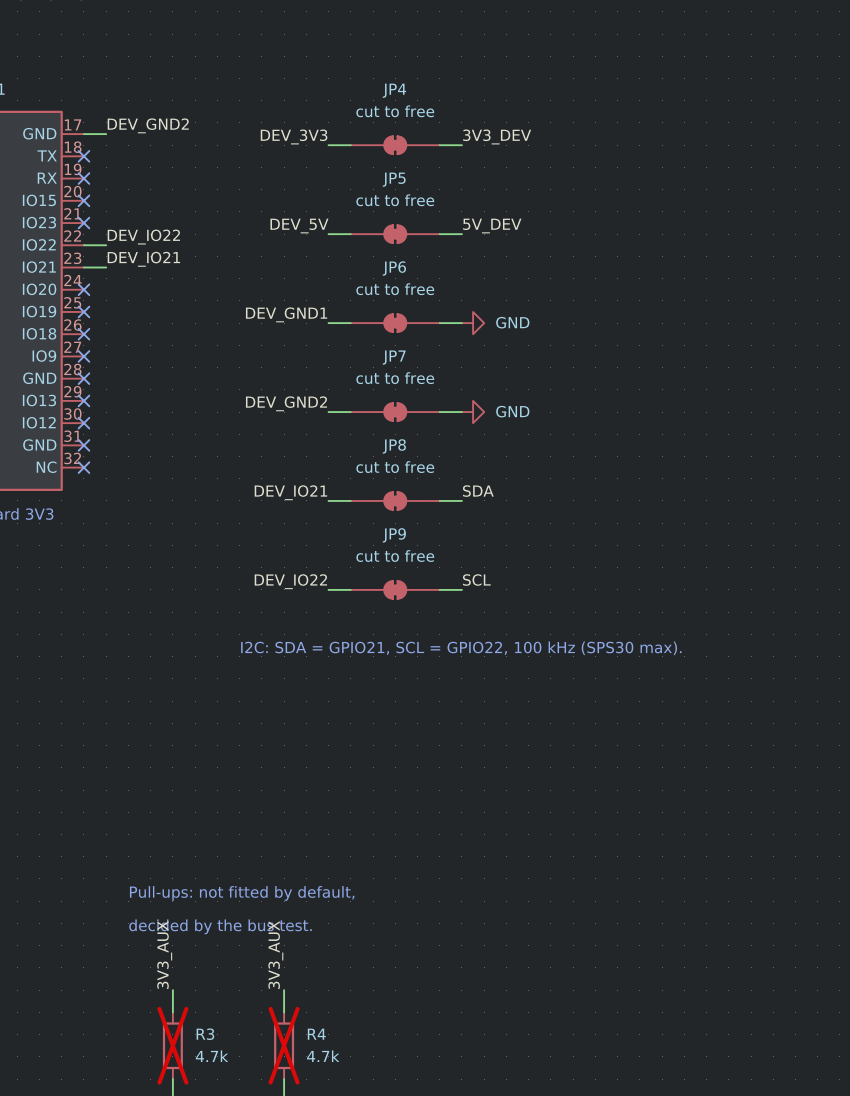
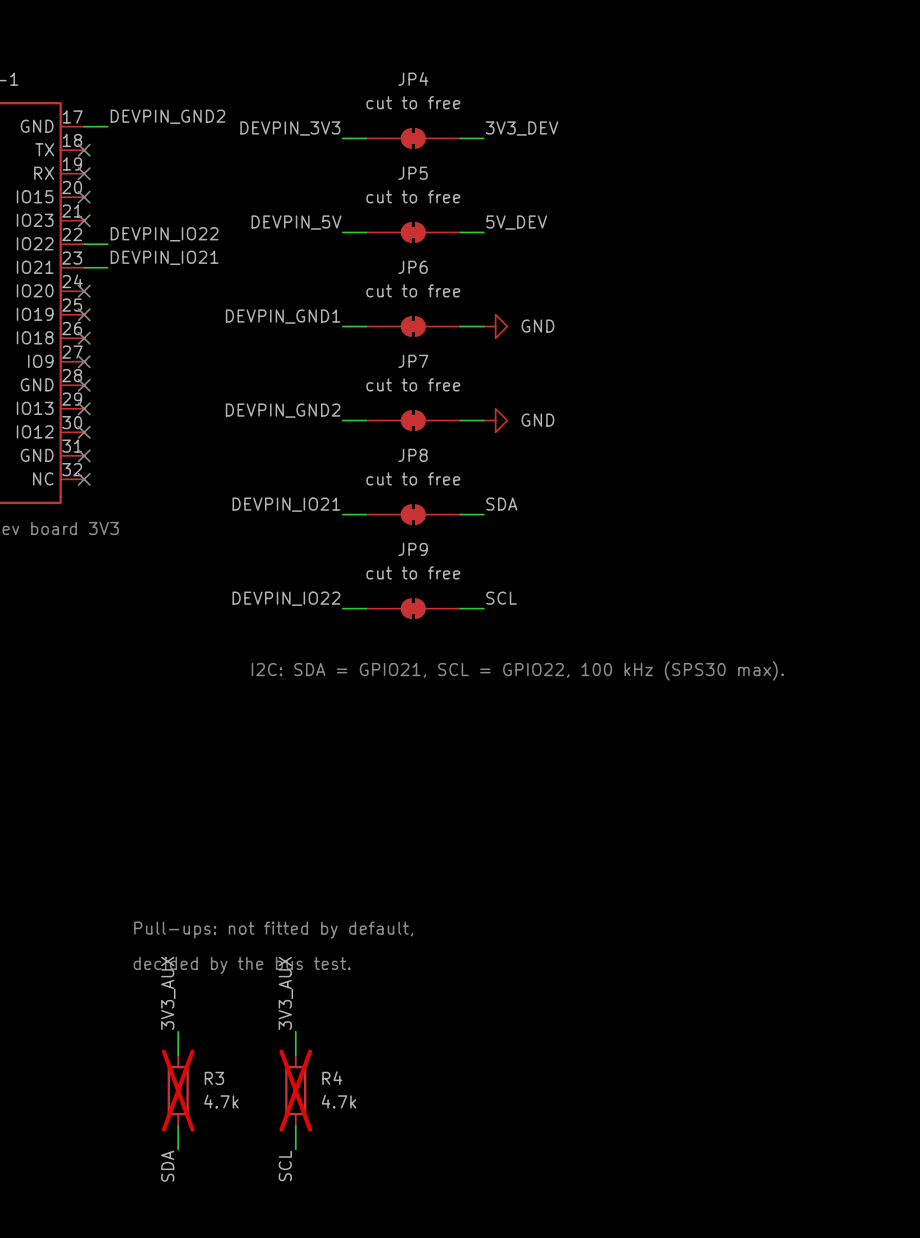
label: DEV_GND2 (148, 125) -> DEVPIN_GND2 (167, 116)
label: DEV_3V3 (294, 136) -> DEVPIN_3V3 (290, 128)
label: DEV_5V (299, 226) -> DEVPIN_5V (296, 222)
label: DEV_IO22 (143, 237) -> DEVPIN_IO22 (164, 234)
label: DEV_IO21 (143, 259) -> DEVPIN_IO21 (164, 257)
label: DEV_GND1 (286, 314) -> DEVPIN_GND1 (283, 316)
label: DEV_GND2 (286, 403) -> DEVPIN_GND2 (283, 410)
label: DEV_IO21 (290, 492) -> DEVPIN_IO21 (286, 504)
label: DEV_IO22 (290, 581) -> DEVPIN_IO22 (286, 598)

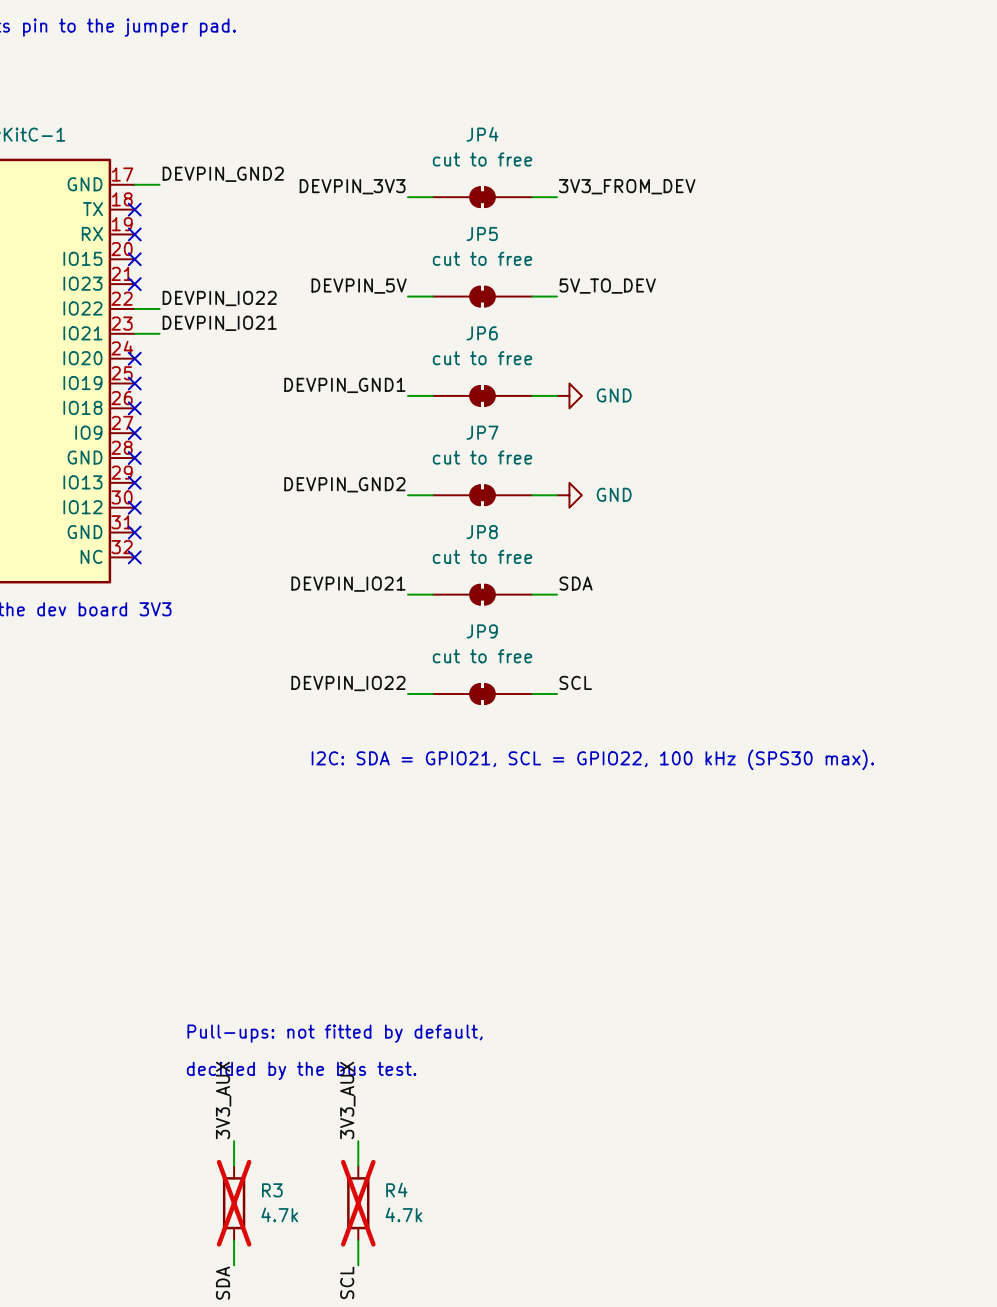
label: 3V3_DEV (522, 128) -> 3V3_FROM_DEV (627, 186)
label: 5V_DEV (516, 222) -> 5V_TO_DEV (607, 286)

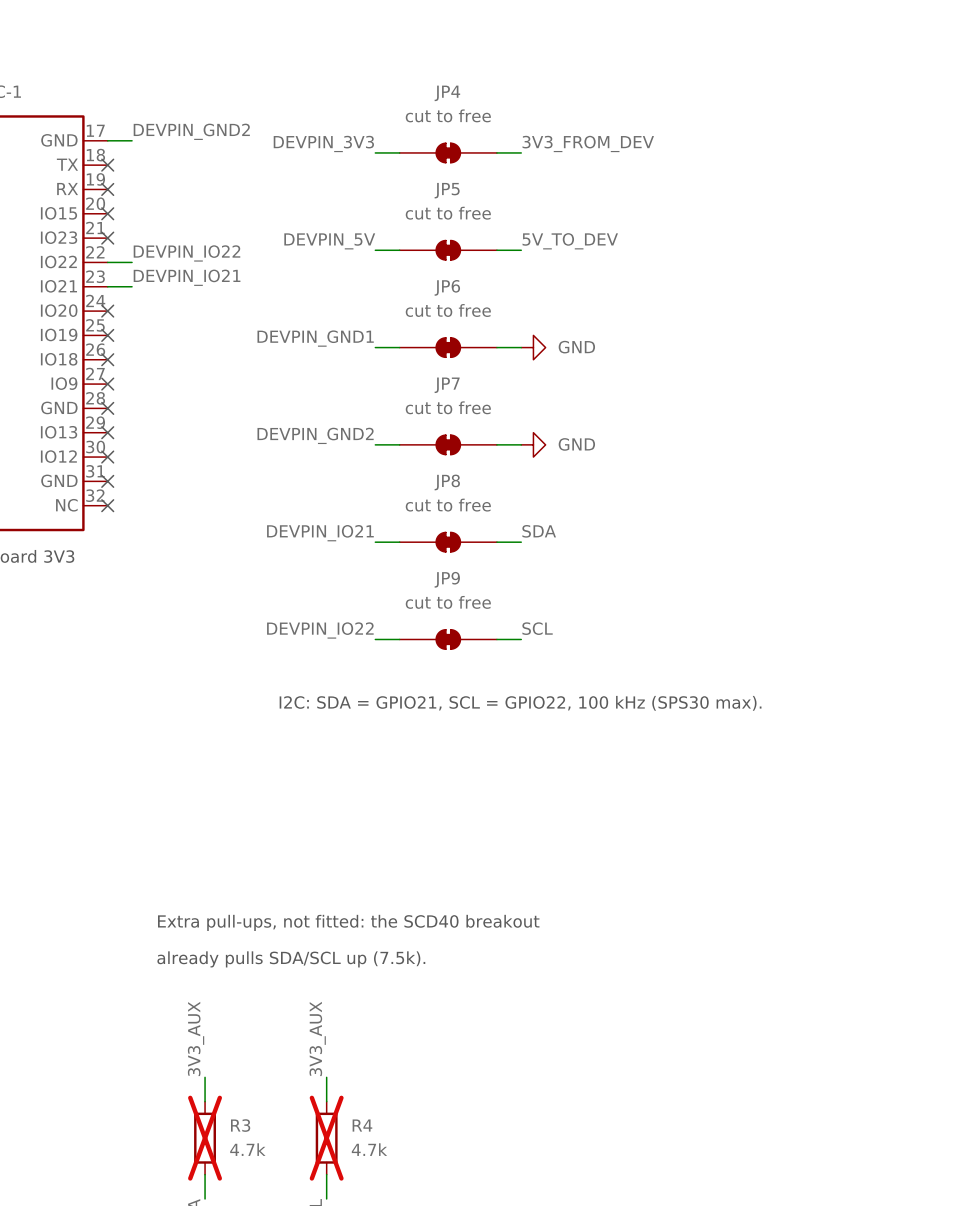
text: none -> Extra pull-ups, not fitted: the SCD40 breakout (348, 922)
text: none -> already pulls SDA/SCL up (7.5k). (291, 959)
text: Pull-ups: not fitted by default, (335, 1033) -> none
text: decided by the bus test. (301, 1070) -> none

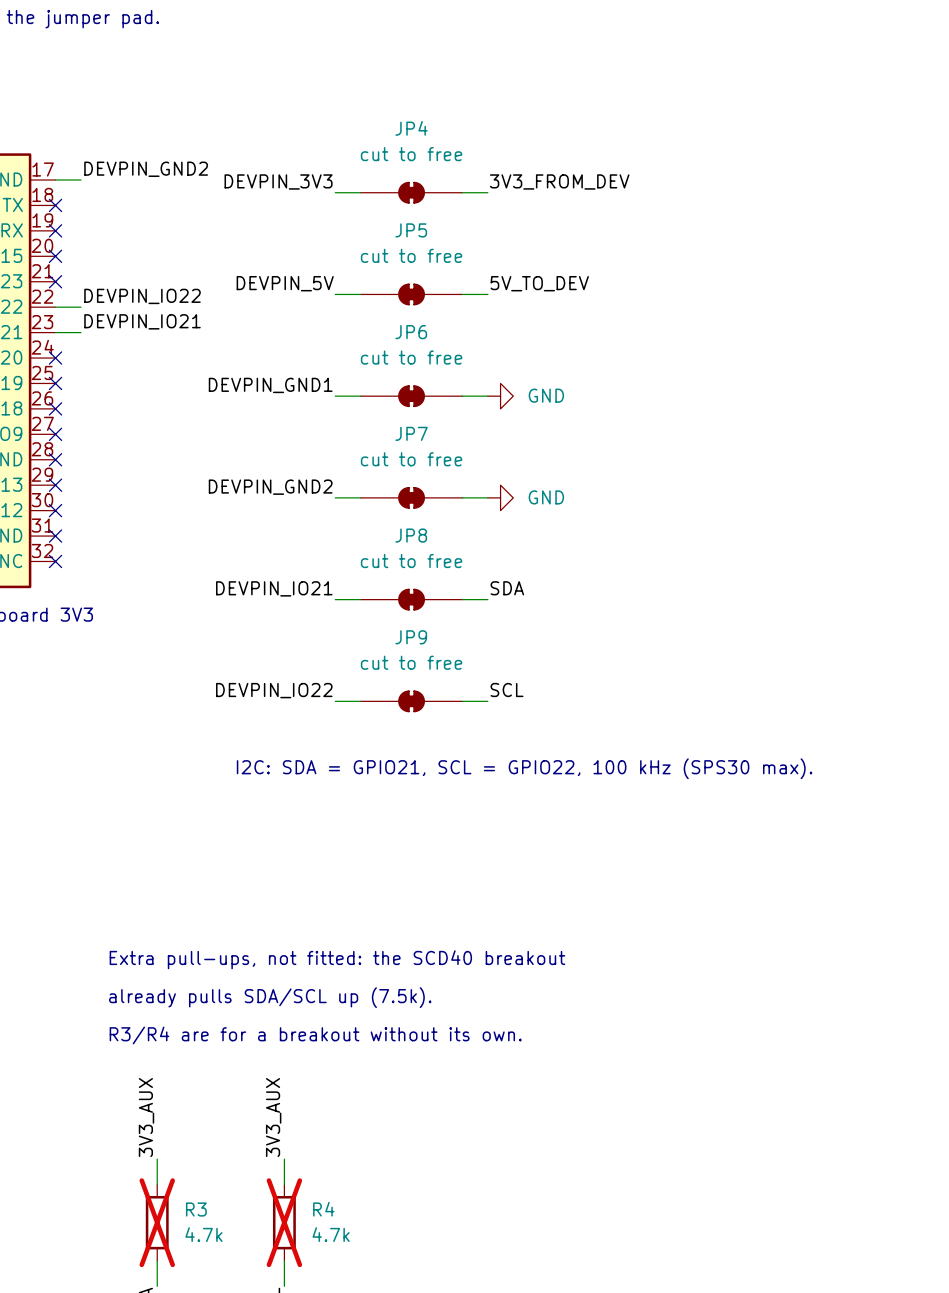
text: none -> Extra pull-ups, not fitted: the SCD40 breakout (337, 959)
text: Extra pull-ups, not fitted: the SCD40 breakout (348, 922) -> already pulls SDA/SCL up (7.5k). (270, 997)
text: already pulls SDA/SCL up (7.5k). (291, 959) -> R3/R4 are for a breakout without its own. (315, 1035)

